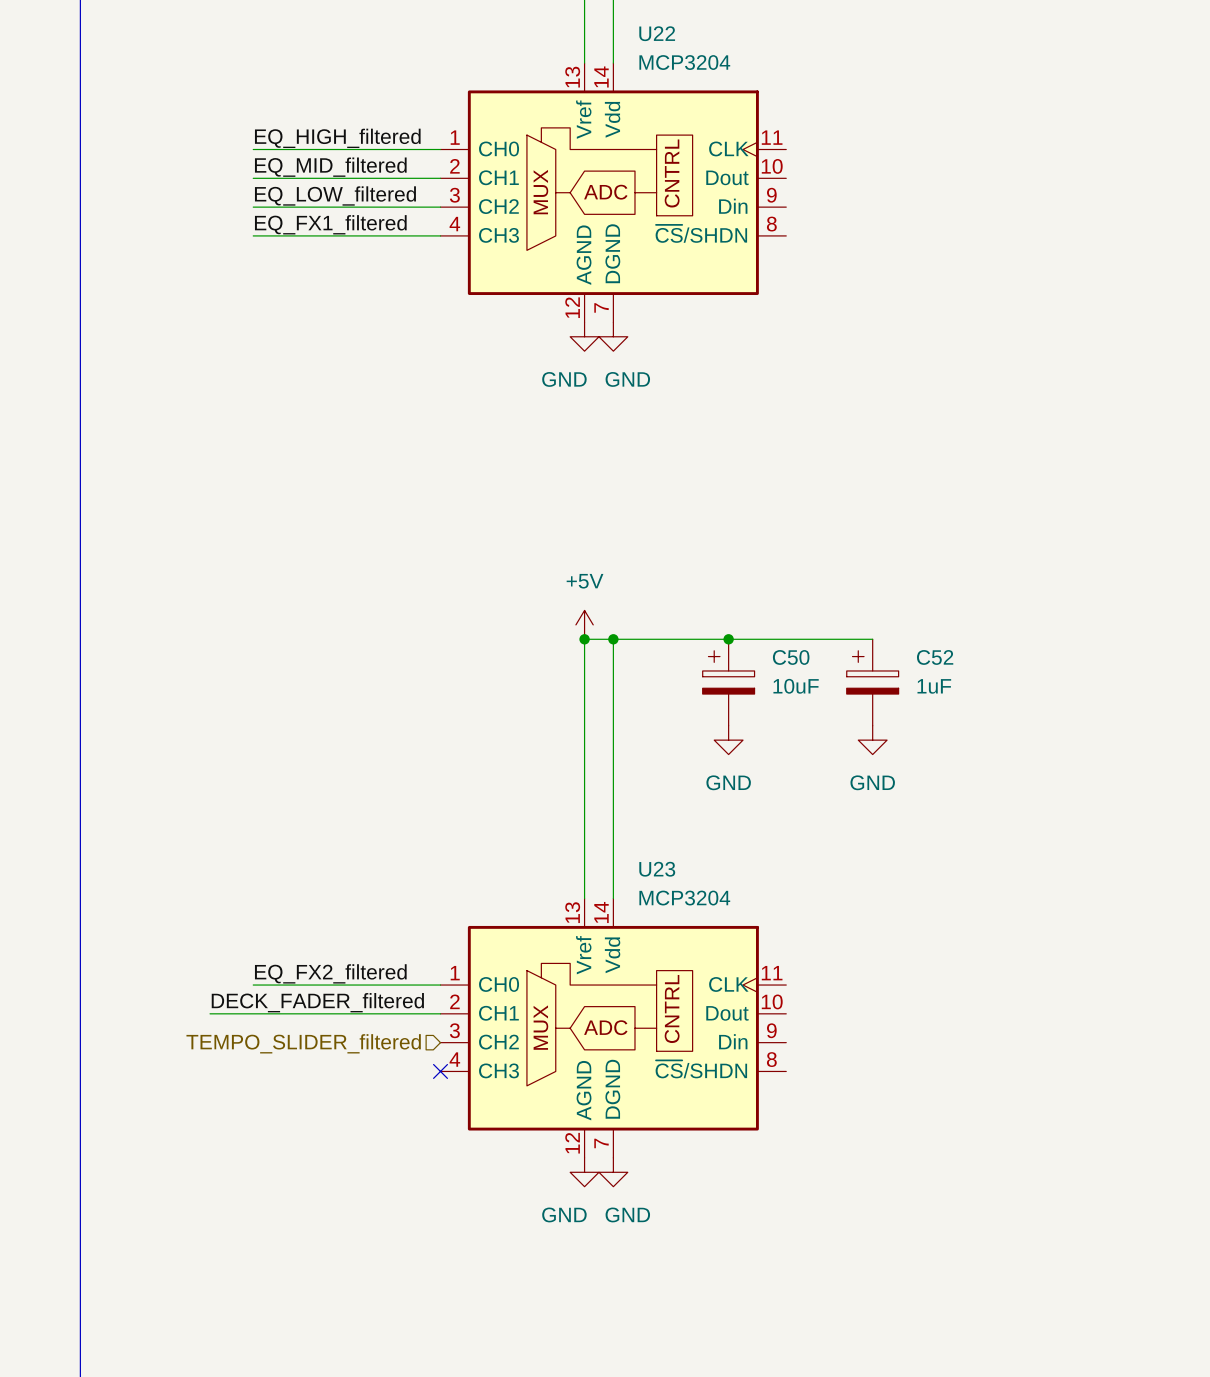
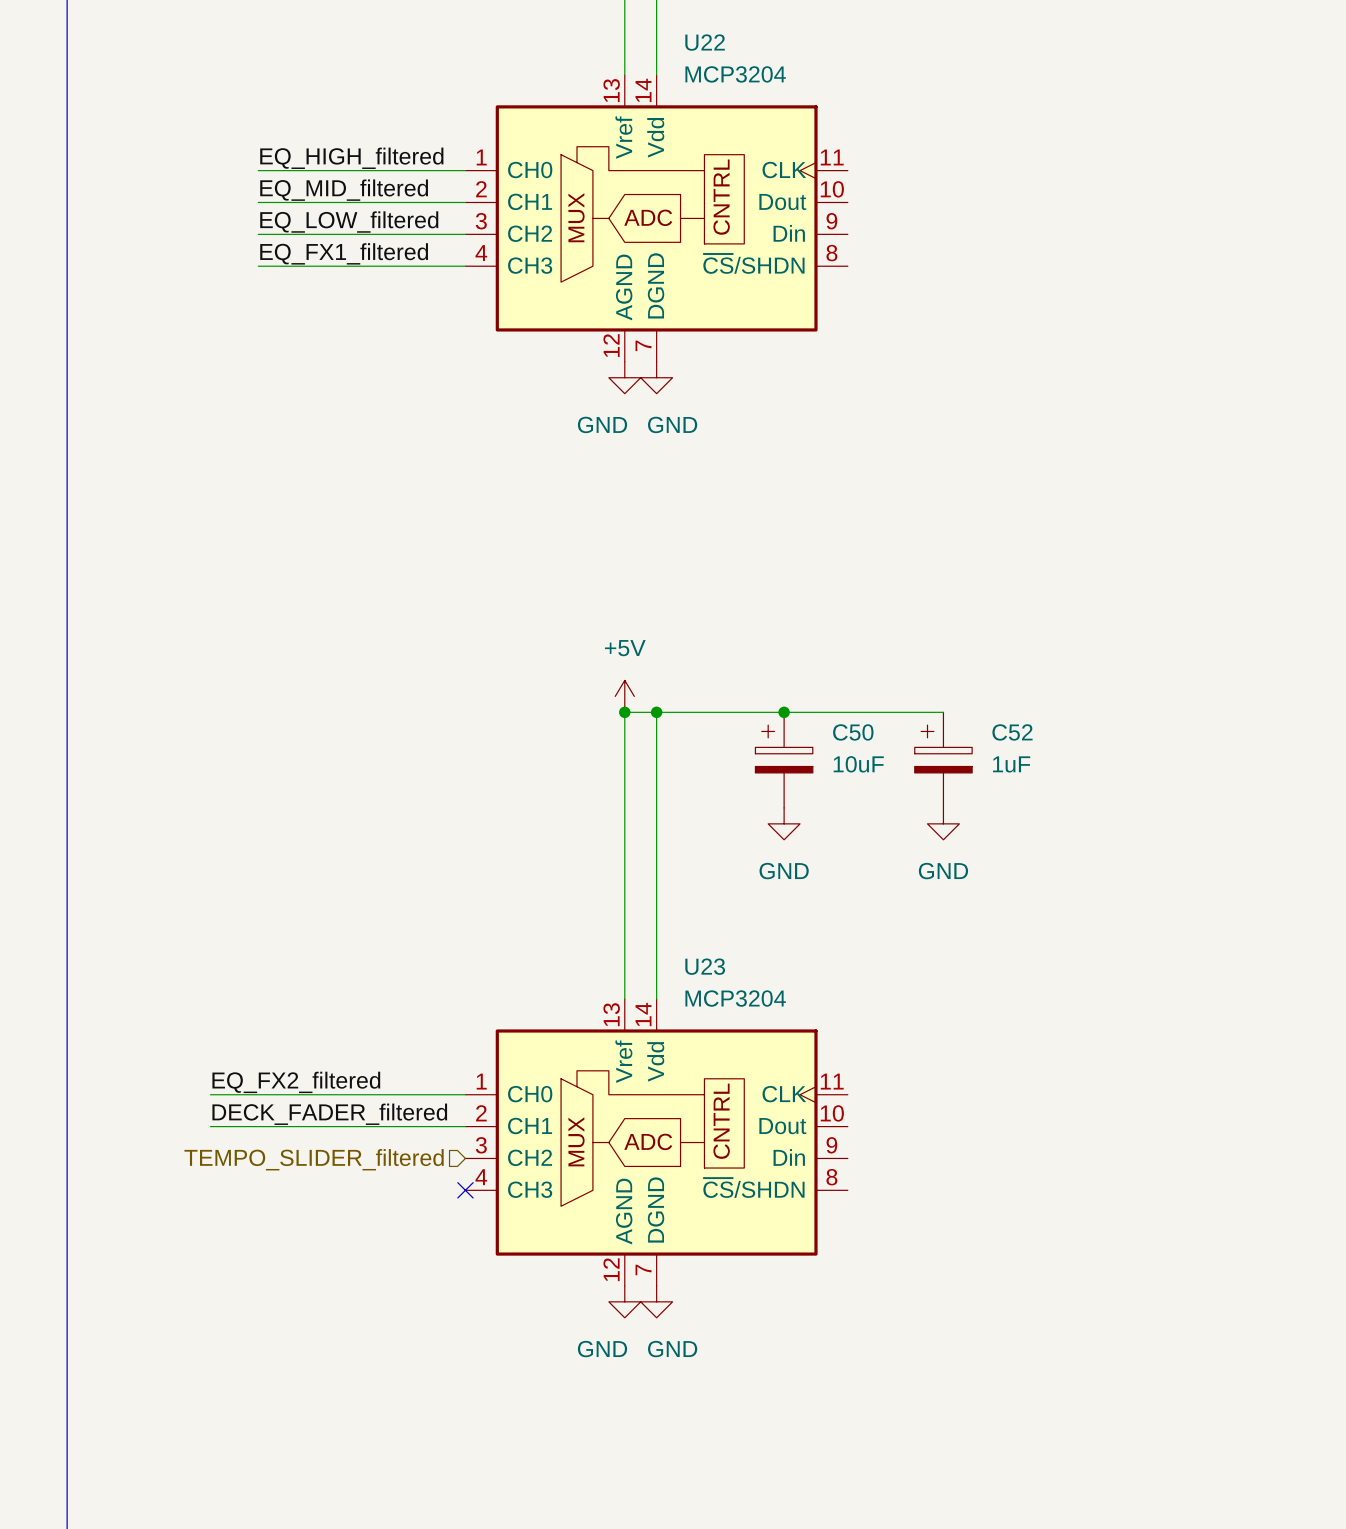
label position: EQ_FX2_filtered (330, 973) -> EQ_FX2_filtered (296, 1082)
wire: none -> (210, 1094) (258, 1094)

